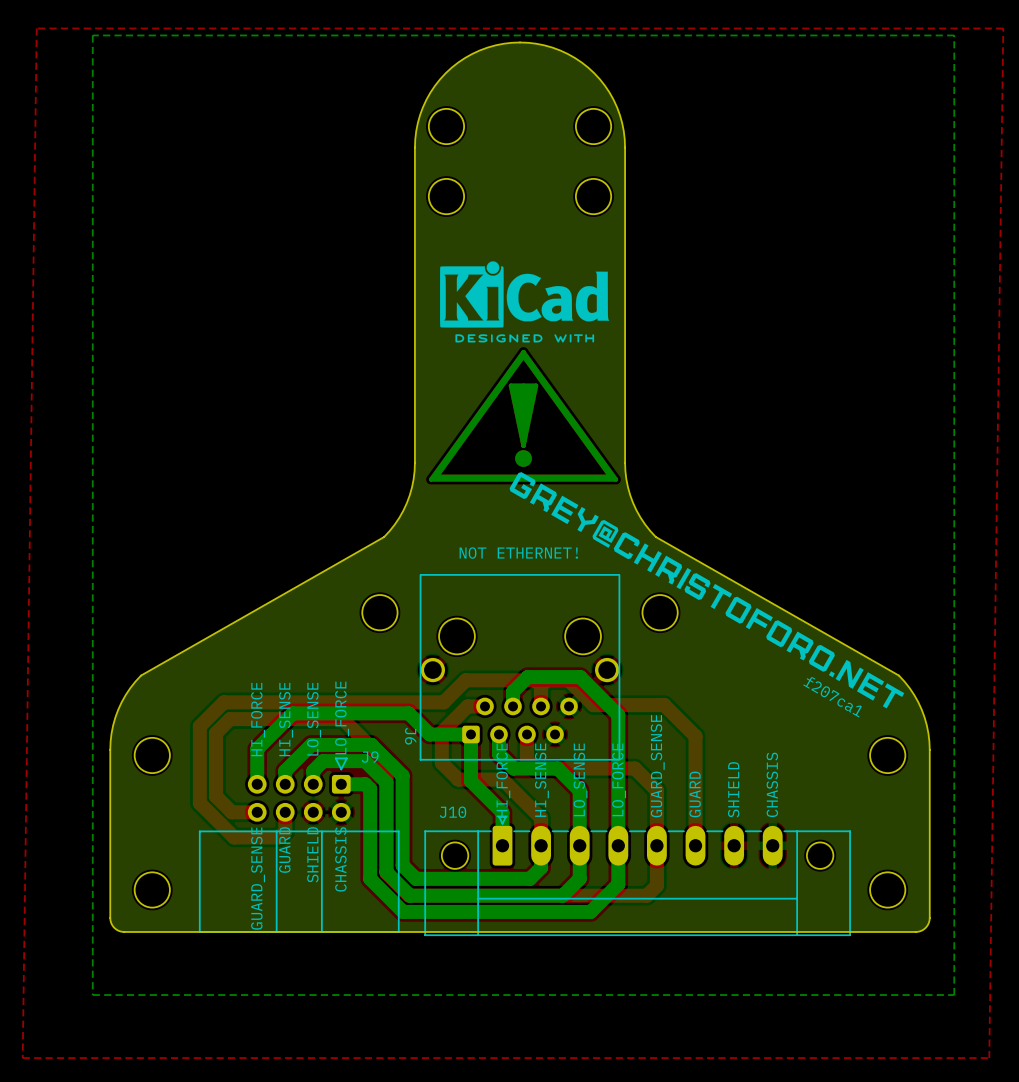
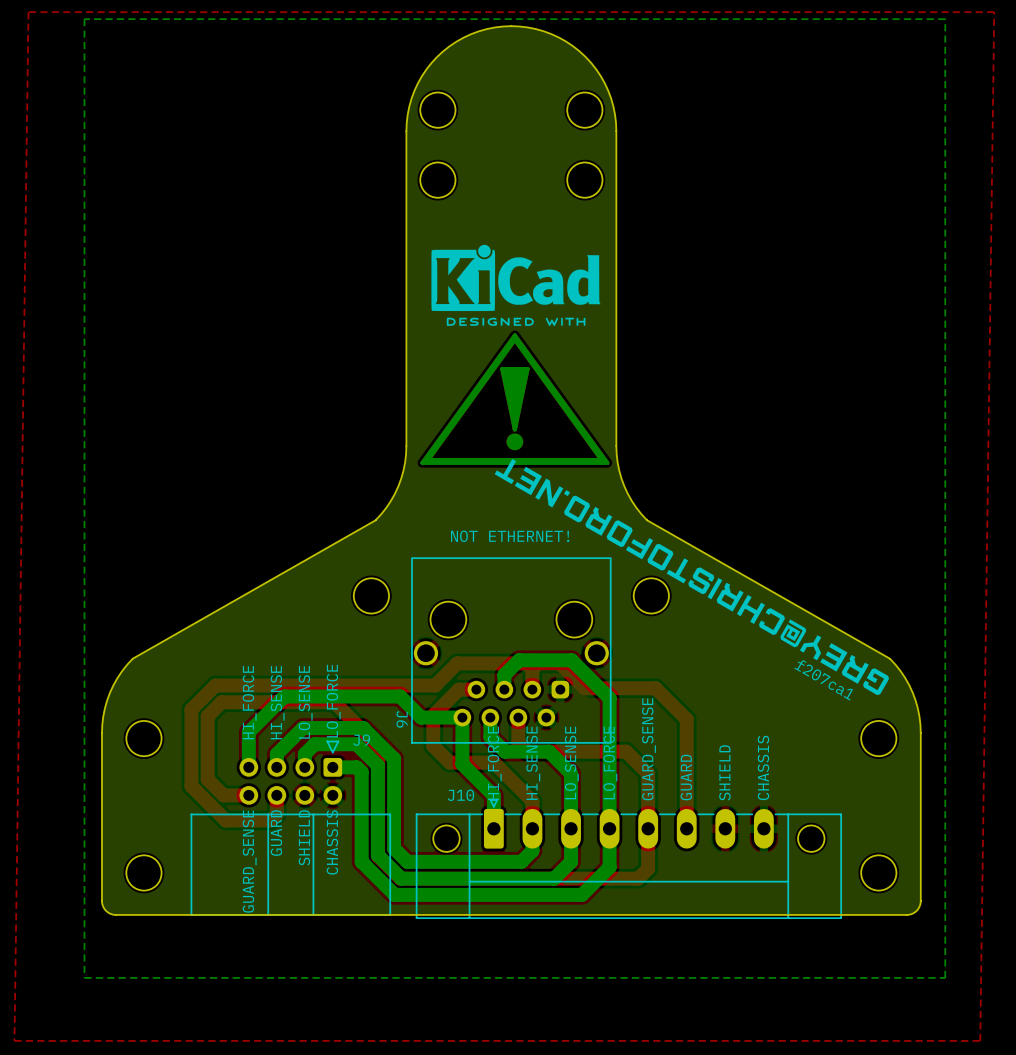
drawing shape: [509, 472, 905, 709] -> [494, 458, 890, 696]
J6 footprint: [419, 574, 621, 761] -> [411, 557, 612, 744]
J10 name position: J10 (453, 812) -> J10 (460, 795)

